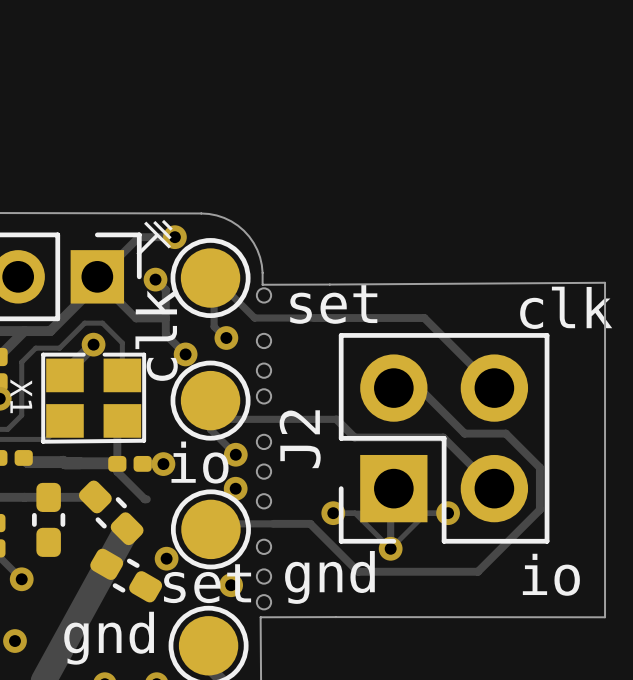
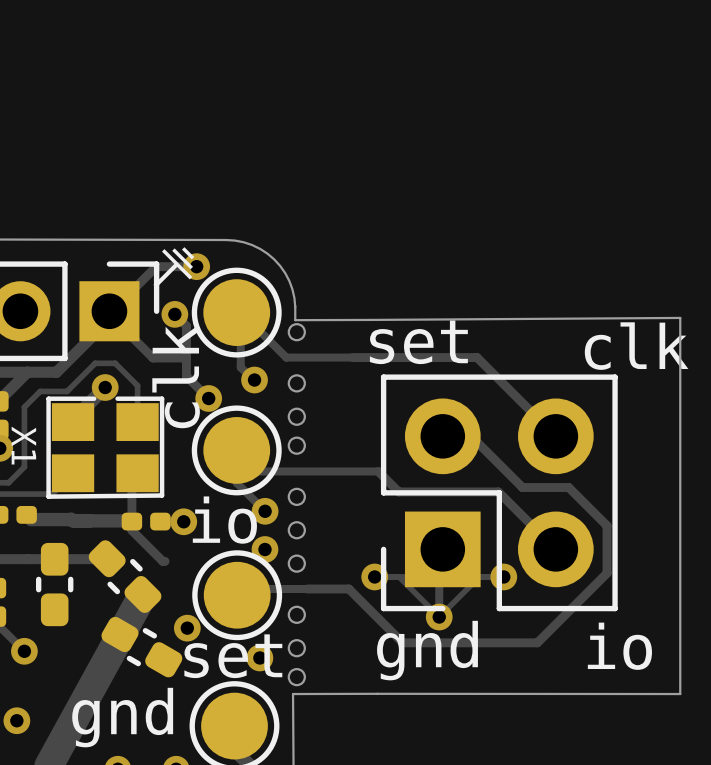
text position: set (333, 304) -> set (418, 342)
J2 name: J2 (300, 439) -> none
text position: gnd (329, 577) -> gnd (427, 650)

